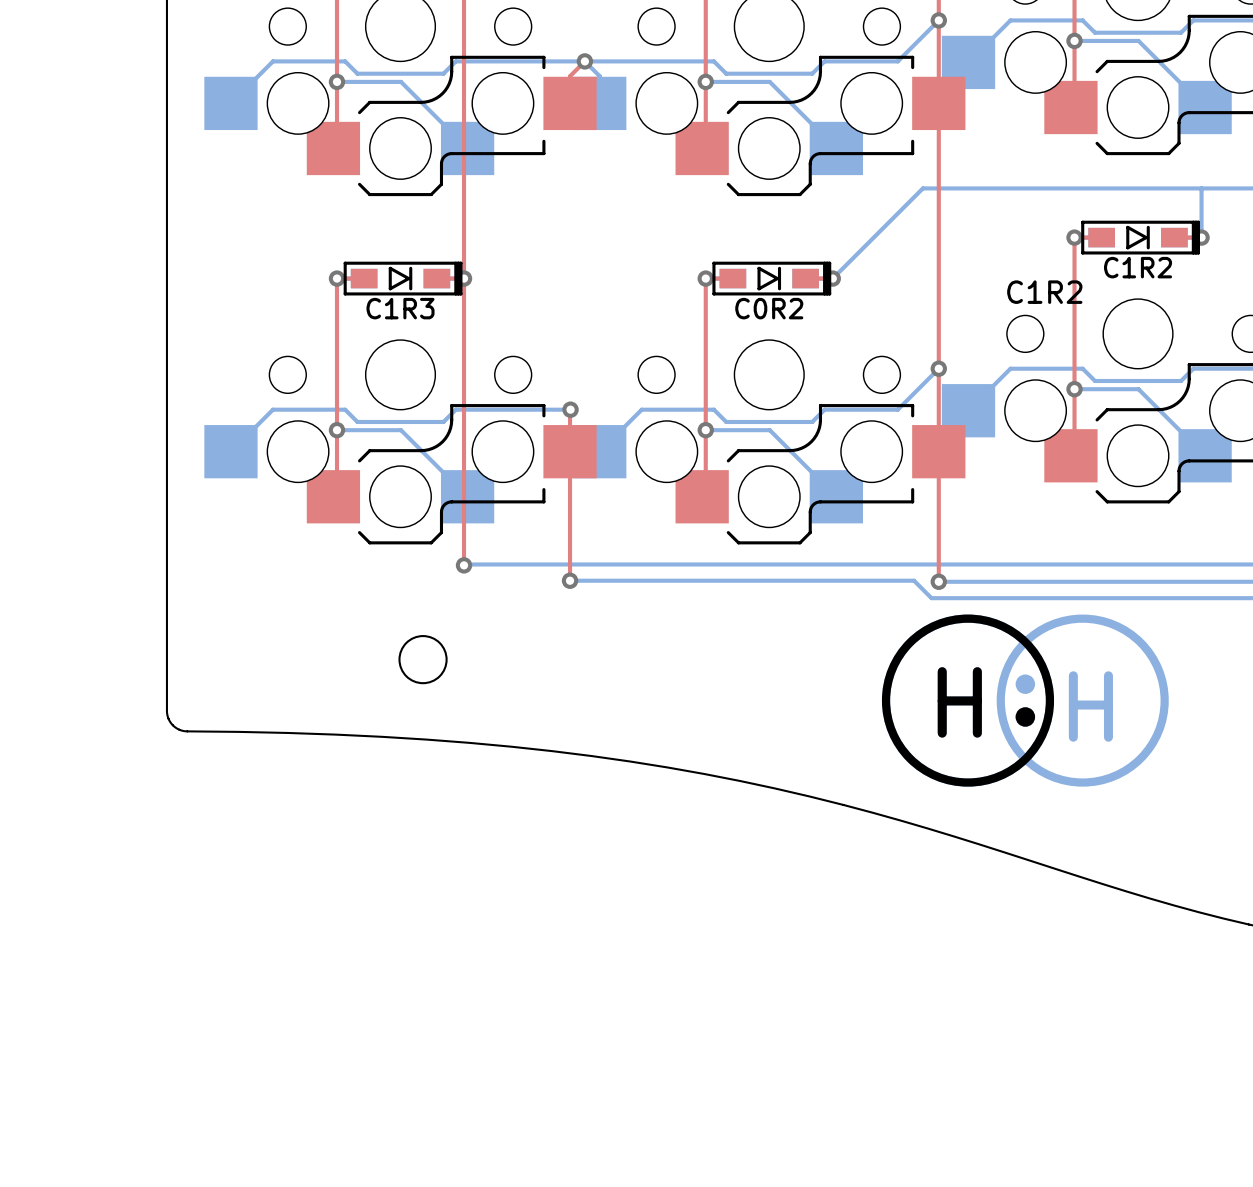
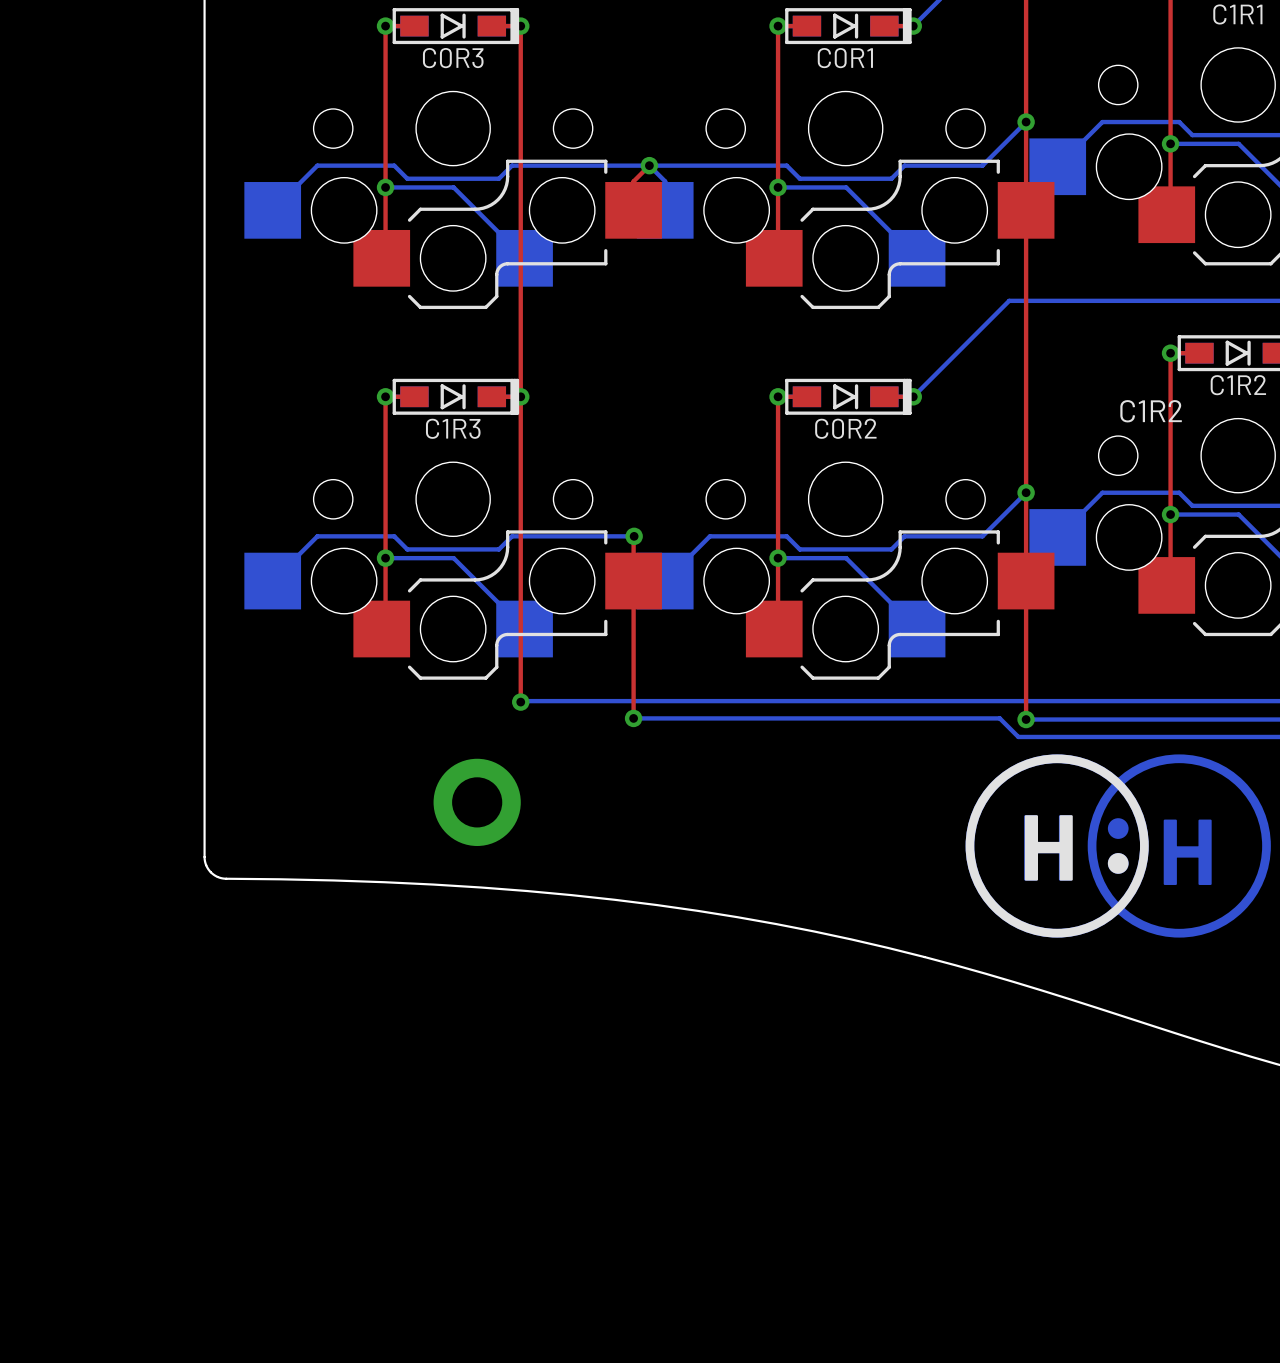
round board edge: [398, 635, 448, 685] -> none
part: none -> (477, 802)

